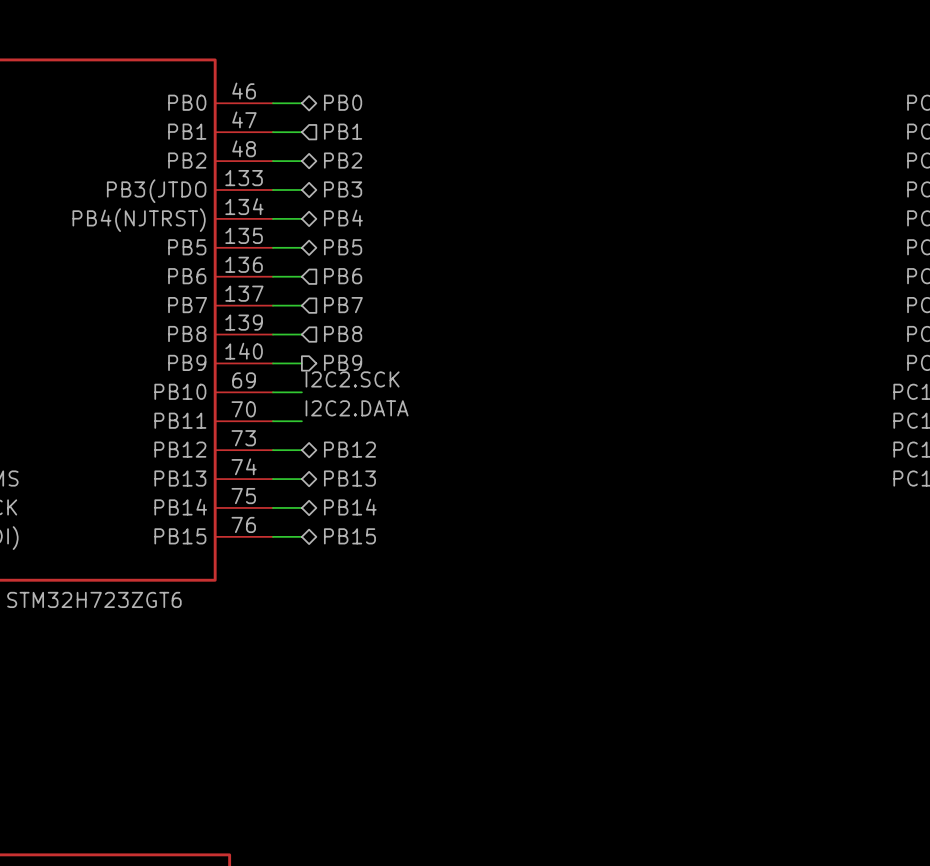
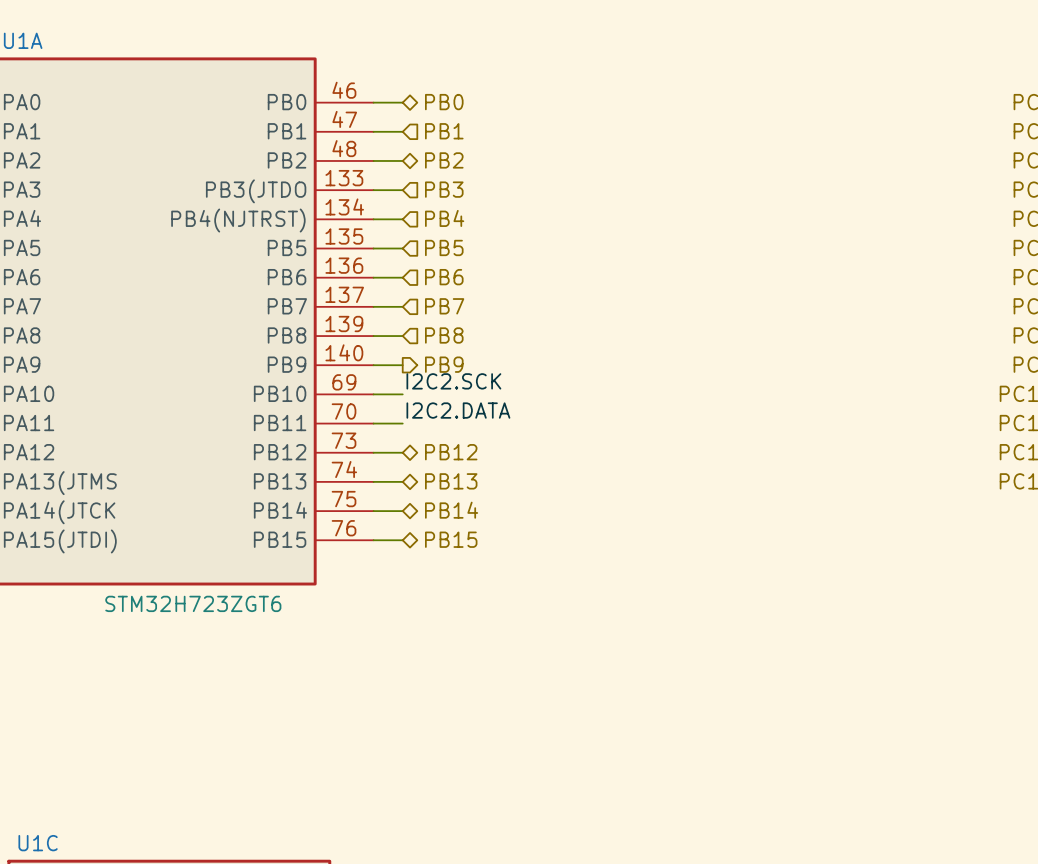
hierarchical label shape: bidirectional (343, 189) -> input (444, 189)
hierarchical label shape: bidirectional (343, 218) -> input (444, 218)
hierarchical label shape: bidirectional (343, 247) -> input (444, 247)

